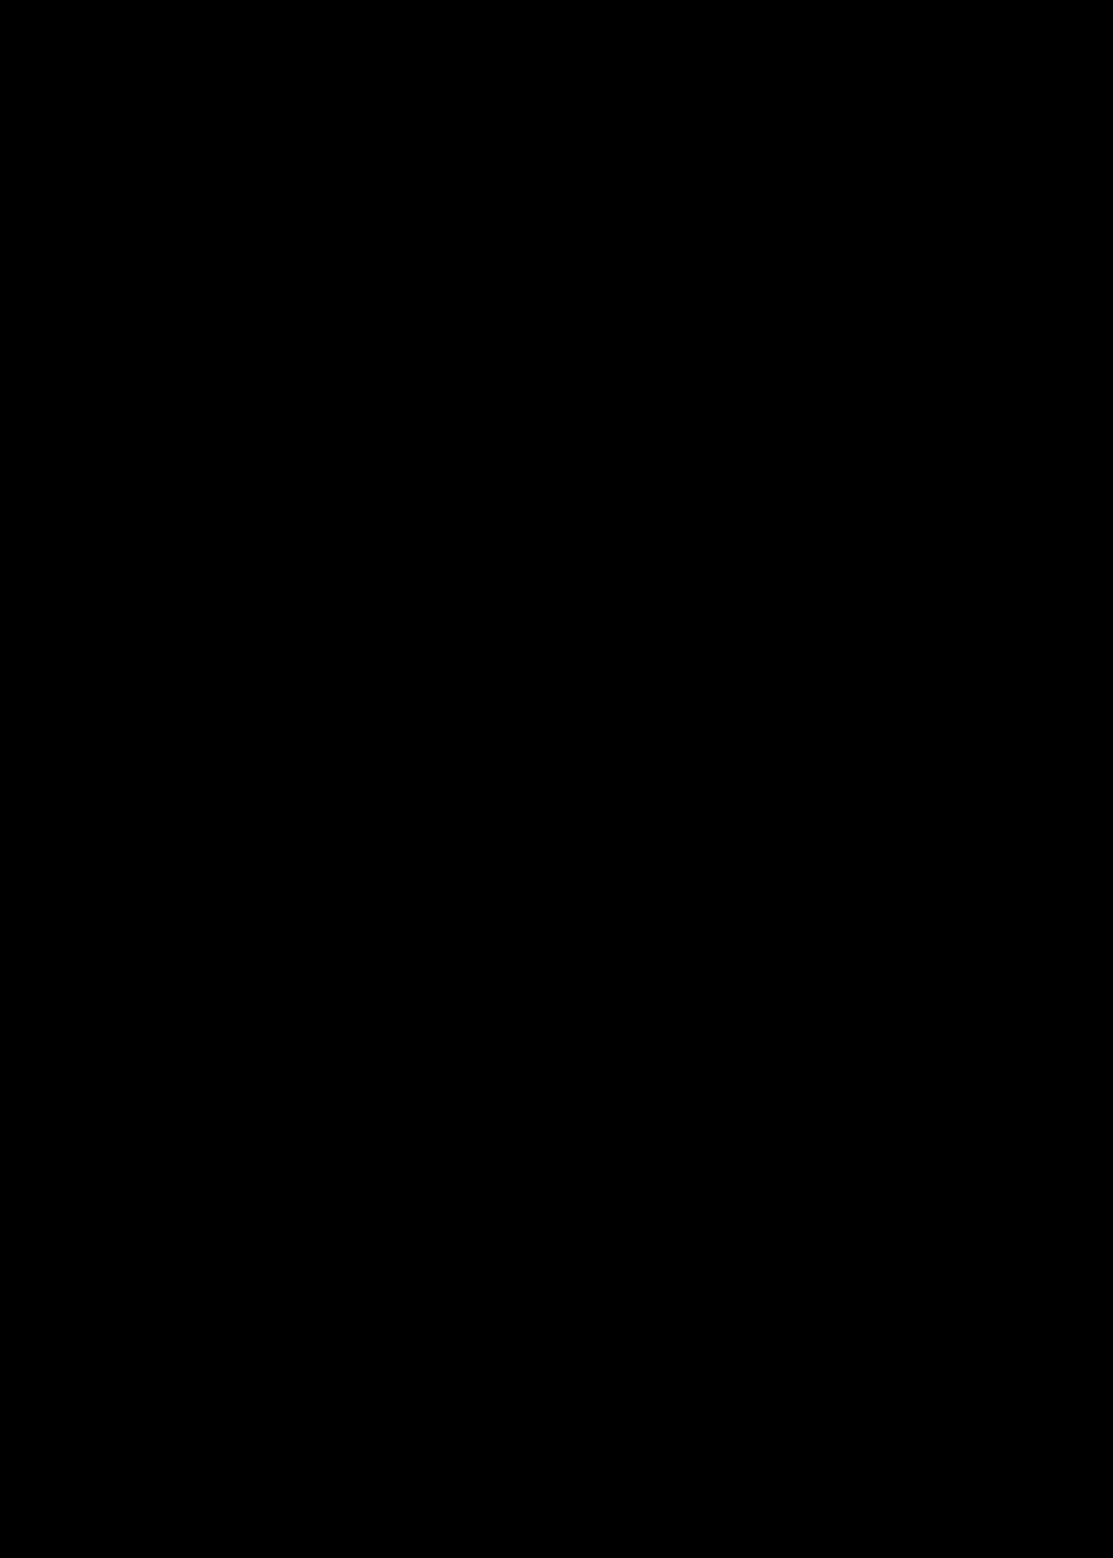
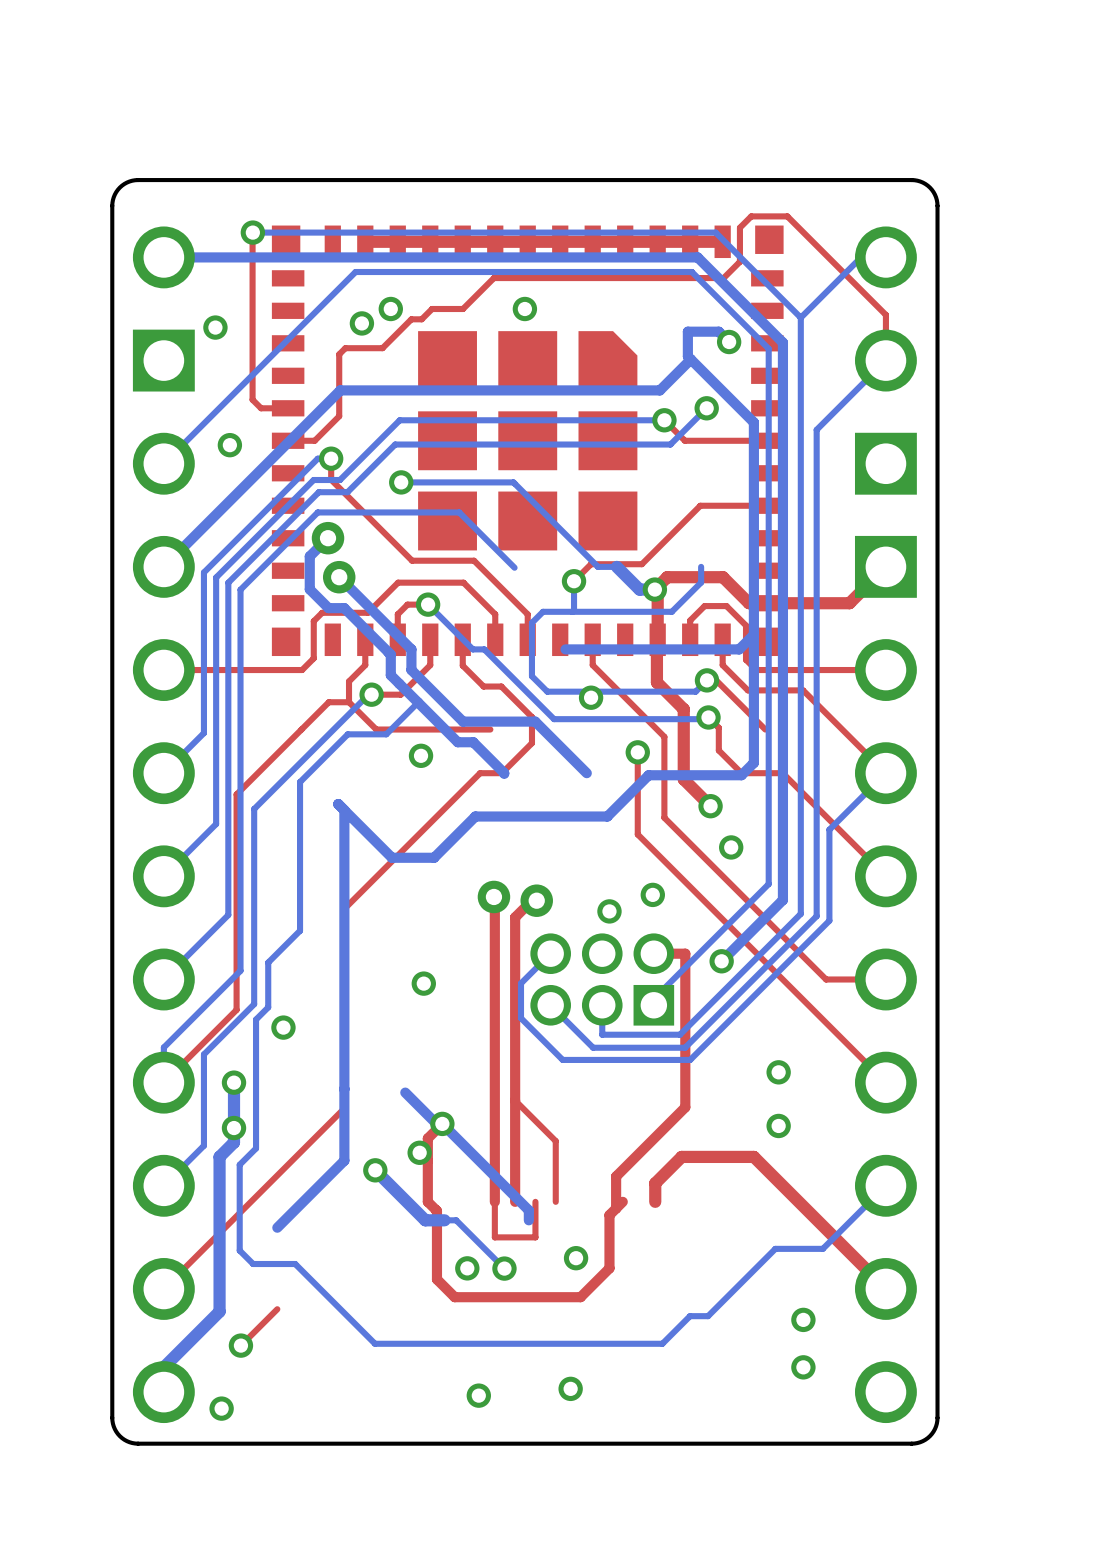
board edge: none -> (911, 180) (138, 180) (126, 182) (116, 192) (112, 205) (112, 1417) (116, 1431) (124, 1439) (138, 1443) (911, 1443) (922, 1441) (933, 1431) (937, 1417) (937, 205) (934, 194) (929, 187) (922, 182) (911, 180)
bottom track: none -> (252, 232) (715, 232) (800, 317)
top track: none -> (252, 232) (252, 399) (261, 408) (288, 408)
via: none -> (252, 232)
top track: none -> (722, 241) (365, 241)
bottom track: none -> (163, 257) (697, 257) (782, 342) (782, 900) (721, 961)
bottom track: none -> (885, 257) (861, 257) (800, 317)
via: none -> (390, 308)
via: none -> (524, 308)
bottom track: none -> (800, 317) (800, 913) (679, 1034) (602, 1034) (602, 1005)
via: none -> (361, 323)
via: none -> (215, 327)
bottom track: none -> (729, 342) (718, 331) (687, 331) (687, 356) (753, 422) (753, 762) (741, 775) (648, 775) (607, 816) (475, 816) (434, 857) (391, 857) (338, 804) (344, 810) (344, 1160) (277, 1227)
via: none -> (729, 342)
bottom track: none -> (690, 359) (659, 390) (340, 390) (163, 566)
bottom track: none -> (885, 360) (816, 429) (816, 916) (685, 1047) (593, 1047) (550, 1005)
top track: none -> (885, 360) (885, 314) (787, 216) (751, 216) (739, 227) (739, 261) (723, 278) (493, 278) (463, 308) (432, 308) (421, 319) (411, 319) (382, 348) (345, 348) (339, 354) (339, 416) (314, 440) (288, 440)
bottom track: none -> (706, 408) (670, 444) (395, 444) (347, 492) (318, 492) (228, 582) (228, 915) (163, 979)
via: none -> (706, 408)
bottom track: none -> (664, 420) (399, 420) (340, 480) (313, 480) (216, 577) (216, 824) (163, 876)
top track: none -> (664, 420) (684, 440) (767, 440)
via: none -> (664, 420)
part: none -> (527, 440)
via: none -> (229, 445)
bottom track: none -> (331, 458) (317, 458) (203, 572) (203, 733) (163, 773)
top track: none -> (331, 458) (331, 479) (412, 560) (474, 560) (527, 614) (527, 639)
via: none -> (331, 458)
bottom track: none -> (163, 463) (355, 272) (691, 272) (768, 348) (768, 884) (653, 998) (653, 1005)
bottom track: none -> (401, 482) (513, 482) (597, 566) (616, 566) (639, 589) (654, 589)
via: none -> (401, 482)
top track: none -> (767, 505) (700, 505) (641, 564) (591, 564) (574, 581)
bottom track: none -> (328, 538) (309, 556) (309, 589) (328, 608) (344, 608) (390, 654) (390, 675) (457, 742) (473, 742) (504, 773)
via: none -> (328, 538)
bottom track: none -> (701, 566) (701, 582) (671, 611) (543, 611) (531, 622) (531, 676) (547, 691) (695, 691) (706, 680)
top track: none -> (885, 566) (849, 603) (748, 603) (722, 577) (667, 577) (654, 589) (657, 592) (656, 682) (683, 709) (683, 779) (710, 806)
bottom track: none -> (514, 567) (459, 512) (317, 512) (240, 589) (240, 970) (163, 1047) (163, 1082)
bottom track: none -> (339, 577) (411, 649) (411, 670) (463, 721) (535, 721) (586, 773)
via: none -> (339, 577)
bottom track: none -> (574, 581) (574, 610) (572, 611)
via: none -> (574, 581)
via: none -> (654, 589)
bottom track: none -> (428, 604) (472, 649) (484, 649) (554, 719) (706, 719) (708, 717)
top track: none -> (428, 604) (407, 604) (397, 614) (397, 639)
via: none -> (428, 604)
bottom track: none -> (753, 634) (739, 649) (565, 649)
top track: none -> (365, 639) (365, 665) (349, 681) (349, 702)
top track: none -> (430, 639) (430, 665) (400, 694) (371, 694)
top track: none -> (462, 639) (462, 665) (483, 686) (501, 686) (531, 717) (531, 743) (501, 773) (480, 773) (345, 908) (345, 1107) (163, 1288)
top track: none -> (495, 639) (495, 614) (463, 582) (398, 582) (367, 612) (322, 612) (313, 621) (313, 658) (302, 670) (163, 670)
top track: none -> (592, 639) (592, 665) (664, 736) (664, 817) (826, 979) (885, 979)
top track: none -> (690, 639) (690, 620) (704, 606) (726, 606) (746, 625) (746, 659) (756, 670) (885, 670)
top track: none -> (722, 639) (722, 665) (747, 690) (803, 690) (885, 773)
top track: none -> (706, 680) (716, 680) (765, 729)
via: none -> (706, 680)
bottom track: none -> (371, 694) (368, 694) (254, 809) (254, 1004) (203, 1054) (203, 1145) (163, 1185)
via: none -> (371, 694)
via: none -> (591, 697)
top track: none -> (349, 702) (328, 702) (236, 794) (236, 1009) (163, 1082)
top track: none -> (349, 702) (376, 729) (490, 729)
bottom track: none -> (418, 702) (386, 734) (347, 734) (300, 782) (300, 930) (268, 962) (268, 1007) (256, 1019) (256, 1148) (239, 1164) (239, 1250) (253, 1264) (295, 1264) (375, 1343) (662, 1343) (690, 1316) (708, 1316) (775, 1248) (822, 1248) (885, 1185)
top track: none -> (708, 717) (718, 727) (718, 750) (741, 773) (782, 773) (885, 876)
via: none -> (708, 717)
top track: none -> (637, 752) (637, 834) (885, 1082)
via: none -> (637, 752)
via: none -> (421, 755)
bottom track: none -> (885, 773) (829, 829) (829, 920) (690, 1059) (562, 1059) (521, 1018) (521, 983) (550, 953)
via: none -> (710, 806)
part: none -> (163, 824)
part: none -> (885, 824)
via: none -> (731, 847)
via: none -> (652, 894)
top track: none -> (493, 896) (494, 1237) (535, 1237) (535, 1201)
via: none -> (493, 896)
top track: none -> (536, 900) (535, 897) (515, 917) (515, 1201)
via: none -> (536, 900)
via: none -> (609, 911)
top track: none -> (653, 953) (685, 953) (685, 1107) (616, 1176) (616, 1208)
via: none -> (721, 961)
part: none -> (602, 979)
via: none -> (423, 983)
via: none -> (283, 1027)
via: none -> (778, 1072)
bottom track: none -> (234, 1082) (234, 1142) (219, 1156) (219, 1311) (163, 1367) (163, 1392)
via: none -> (234, 1082)
bottom track: none -> (405, 1092) (436, 1123) (442, 1123) (528, 1210) (528, 1220)
top track: none -> (515, 1100) (555, 1141) (555, 1201)
top track: none -> (442, 1123) (427, 1138) (427, 1201) (436, 1210) (436, 1279) (454, 1297) (580, 1297) (609, 1268) (609, 1215) (622, 1201)
via: none -> (442, 1123)
via: none -> (778, 1125)
via: none -> (234, 1128)
via: none -> (419, 1152)
bottom track: none -> (375, 1170) (425, 1220) (456, 1220) (504, 1268)
via: none -> (375, 1170)
top track: none -> (655, 1201) (655, 1183) (681, 1156) (753, 1156) (885, 1288)
via: none -> (576, 1258)
via: none -> (467, 1268)
via: none -> (504, 1268)
top track: none -> (277, 1309) (240, 1345)
via: none -> (803, 1319)
via: none -> (240, 1345)
via: none -> (803, 1367)
via: none -> (570, 1388)
via: none -> (478, 1395)
via: none -> (221, 1408)

